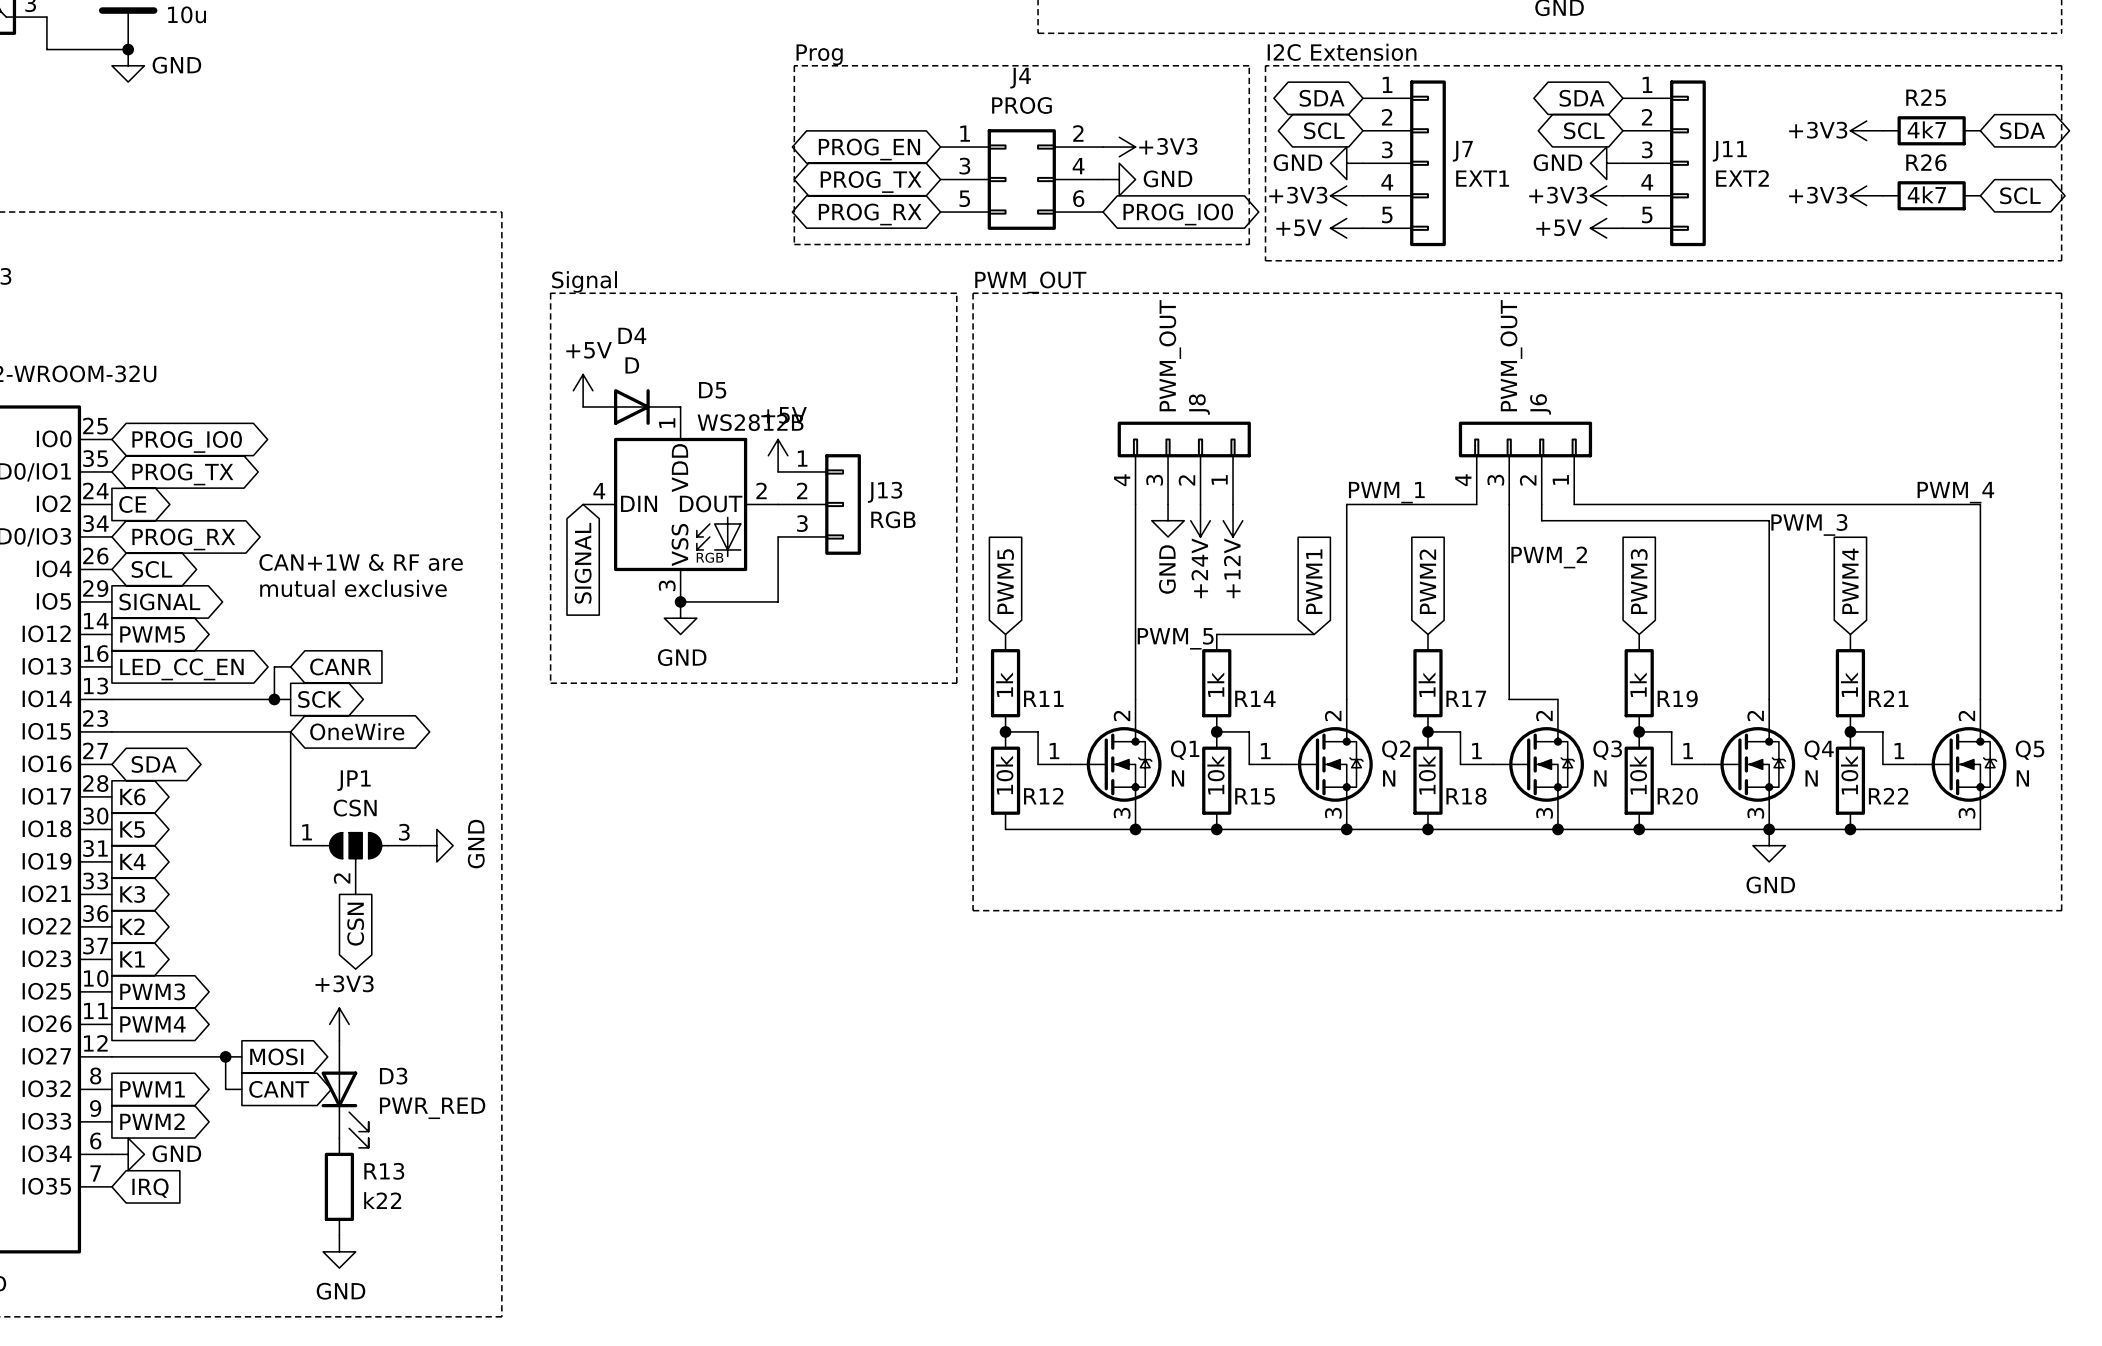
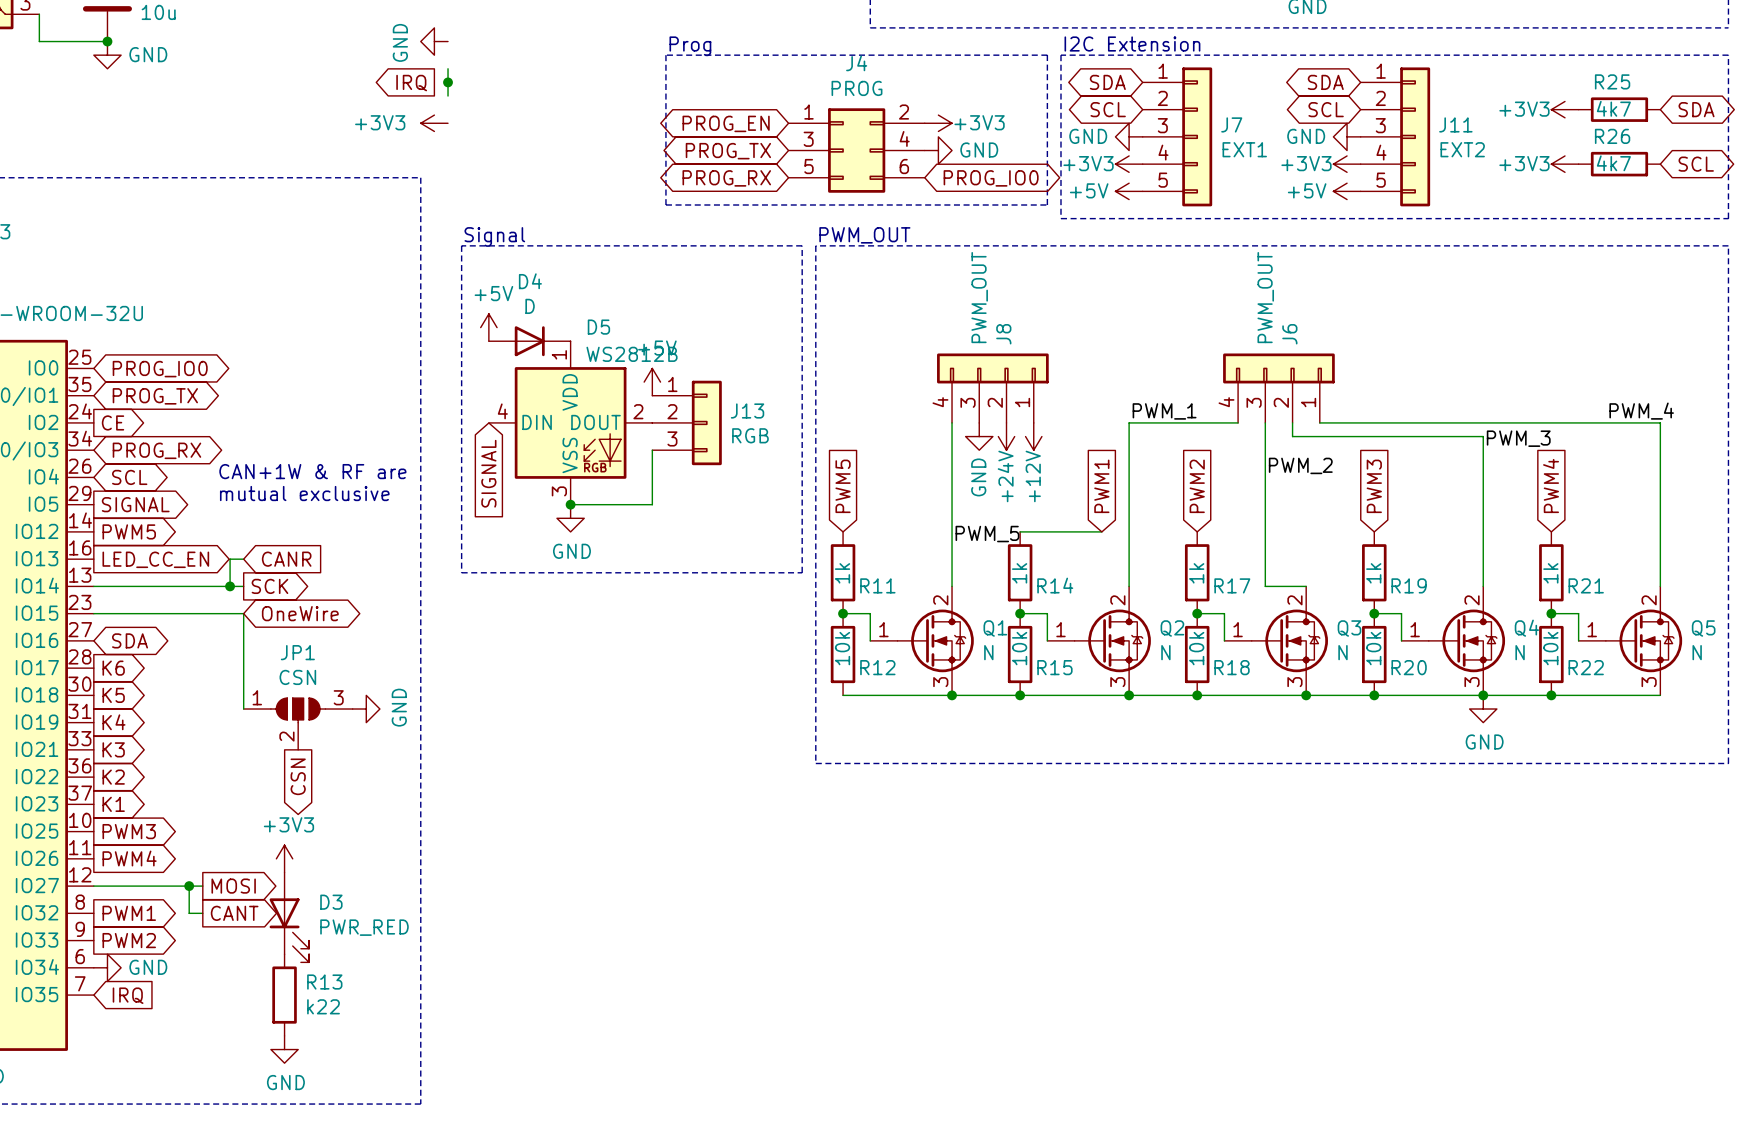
power symbol: none -> GND (434, 41)
wire: none -> (448, 68) (448, 96)
junction: none -> (448, 82)
global label: none -> IRQ (411, 83)
power symbol: none -> +3V3 (434, 123)

